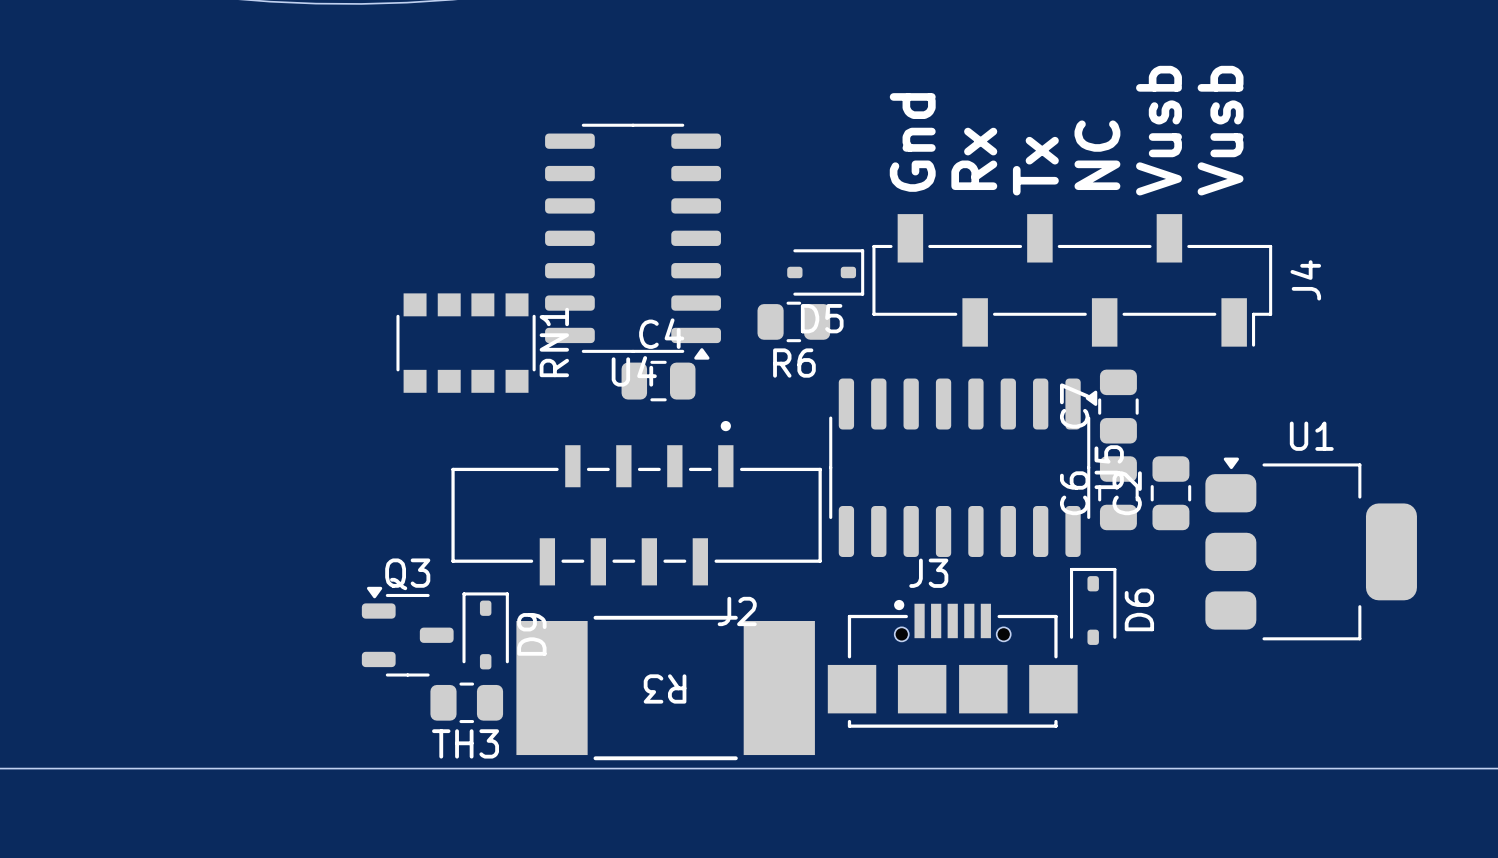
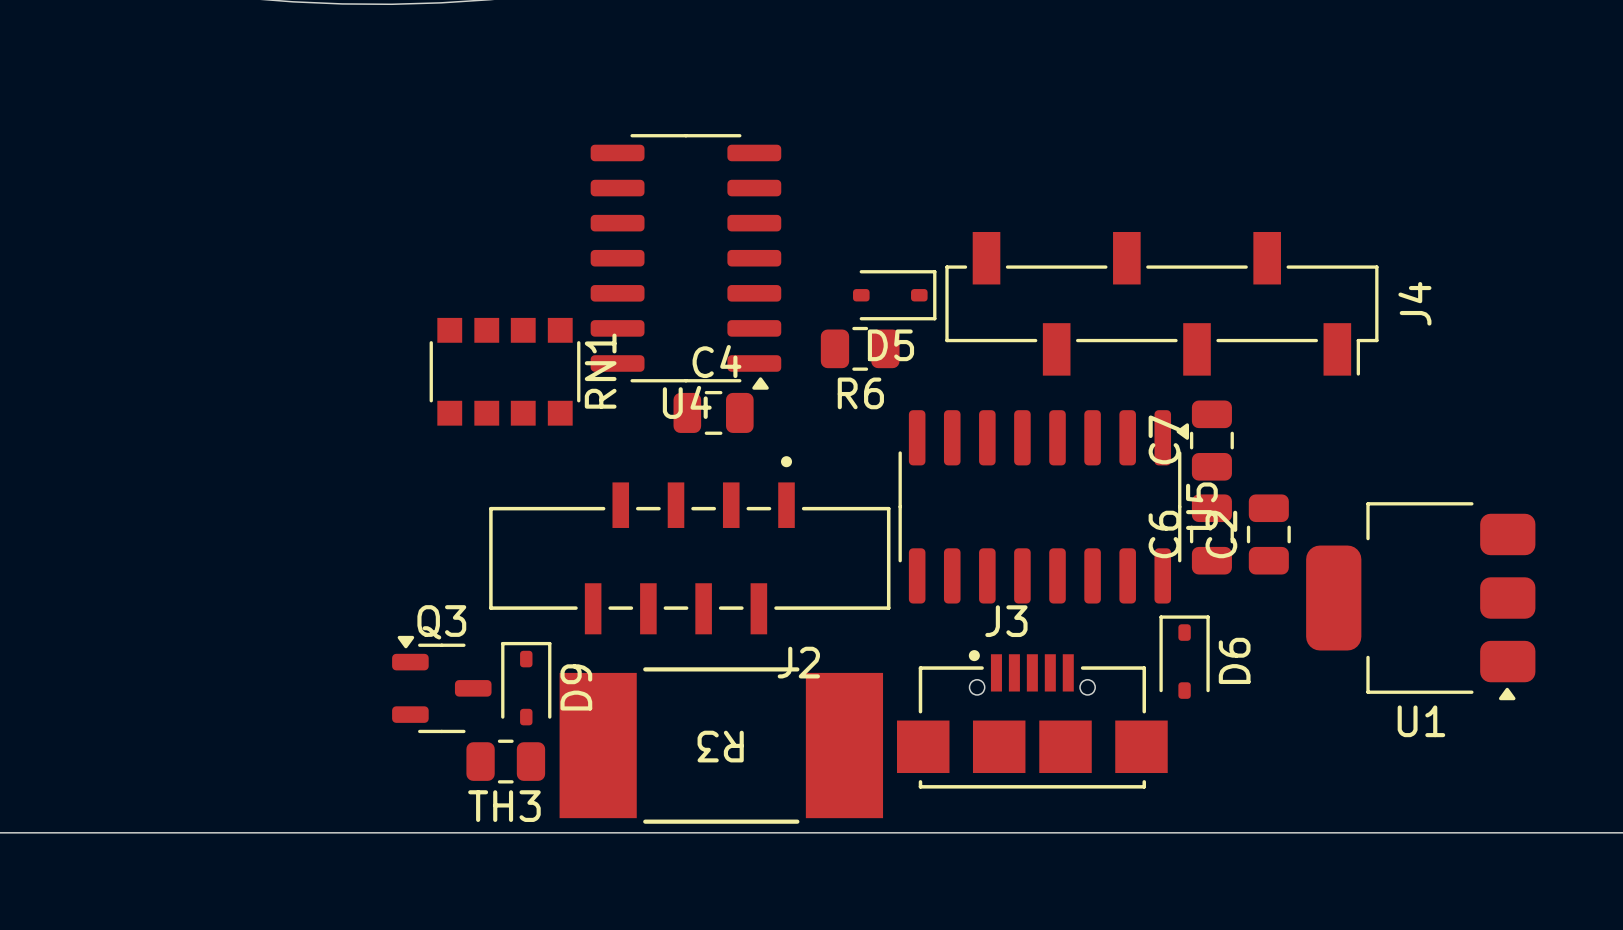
text: Vusb (1159, 130) -> none
text: Vusb (1220, 130) -> none
text: Gnd (912, 142) -> none
text: NC (1097, 155) -> none
text: Rx (974, 158) -> none
text: Tx (1035, 166) -> none
U1 rotation: 0° (1311, 548) -> 180° (1420, 601)

